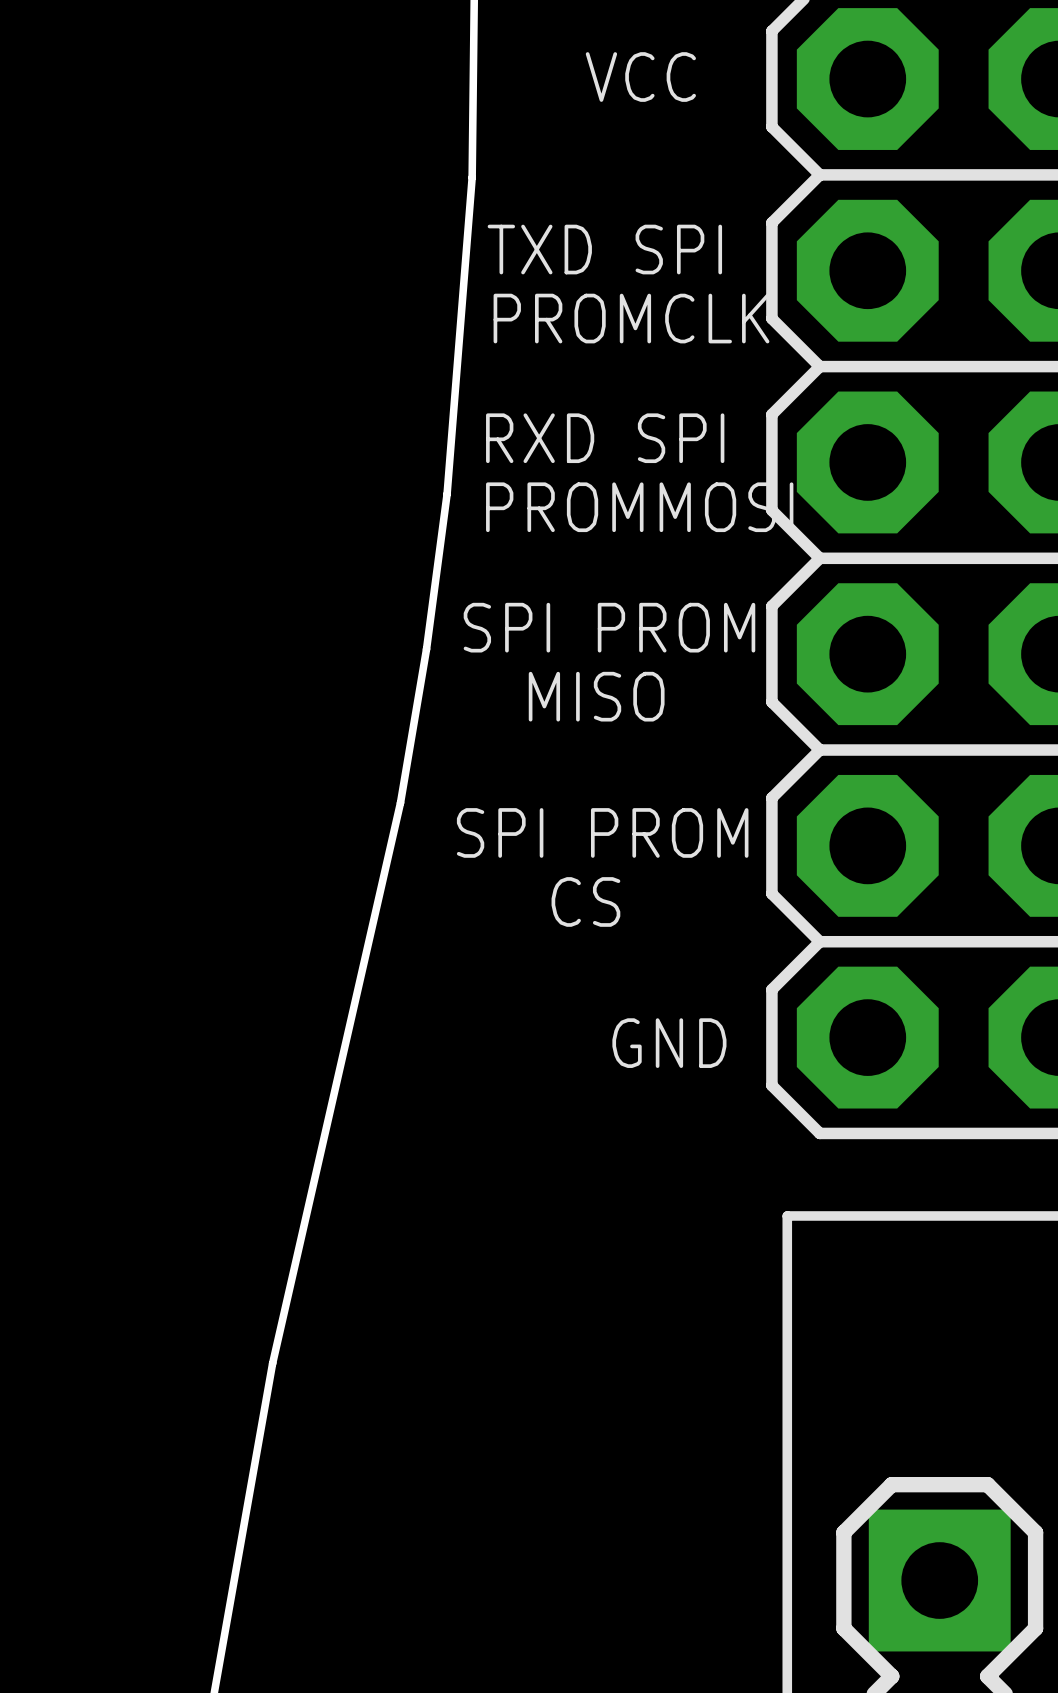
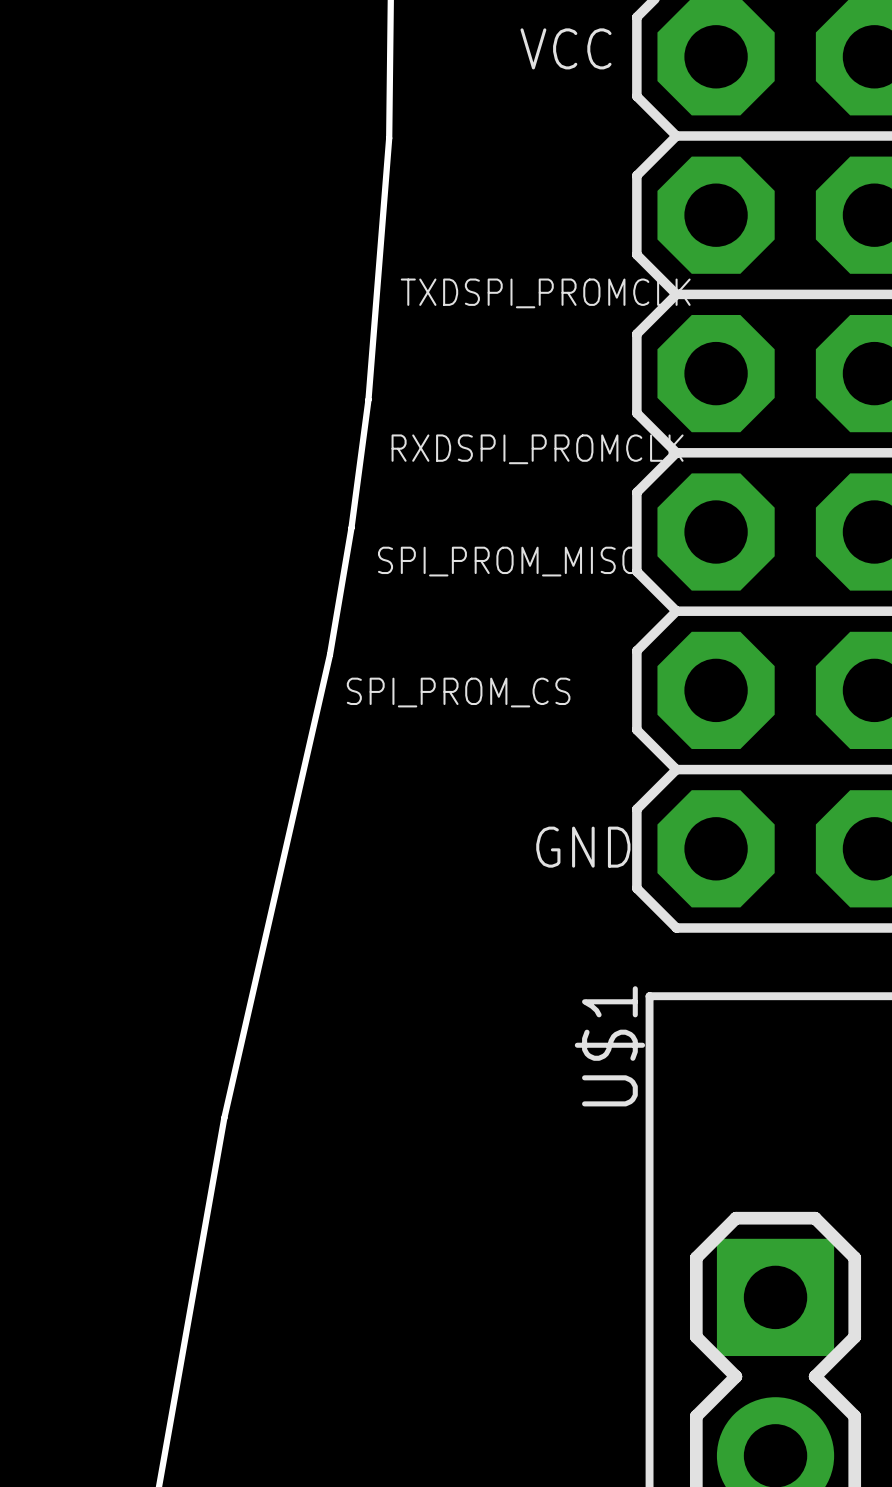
text position: VCC (640, 77) -> VCC (566, 48)
text: TXD SPI (604, 249) -> none
text: PROMCLK (631, 318) -> TXDSPI_PROMCLK (545, 293)
text: RXD SPI (605, 438) -> none
text: PROMMOSI (639, 507) -> RXDSPI_PROMCLK (537, 449)
text: SPI PROM (609, 627) -> none
text: MISO (596, 696) -> SPI_PROM_MISO (508, 561)
text: SPI PROM (602, 832) -> SPI_PROM_CS (458, 692)
text: CS (585, 901) -> none
text position: GND (669, 1043) -> GND (583, 847)
U$1 name: none -> U$1 (609, 1046)

